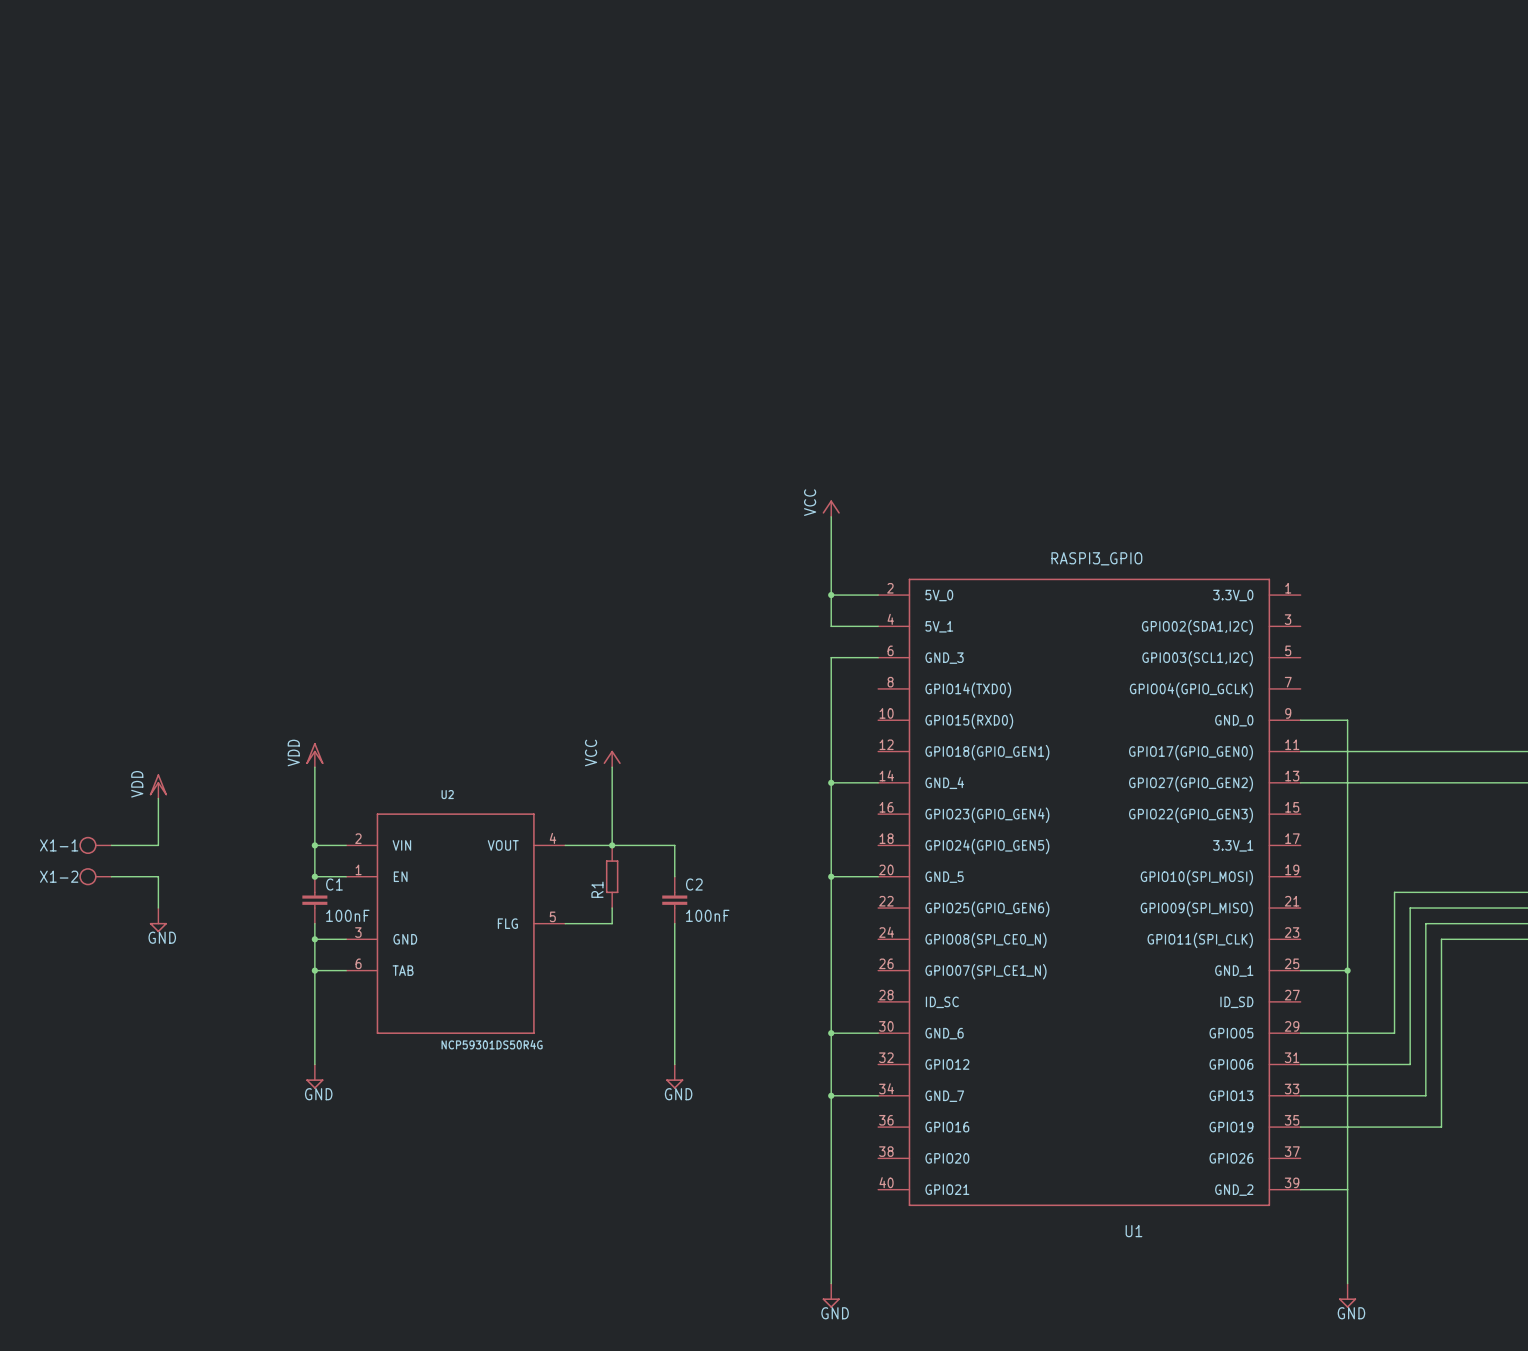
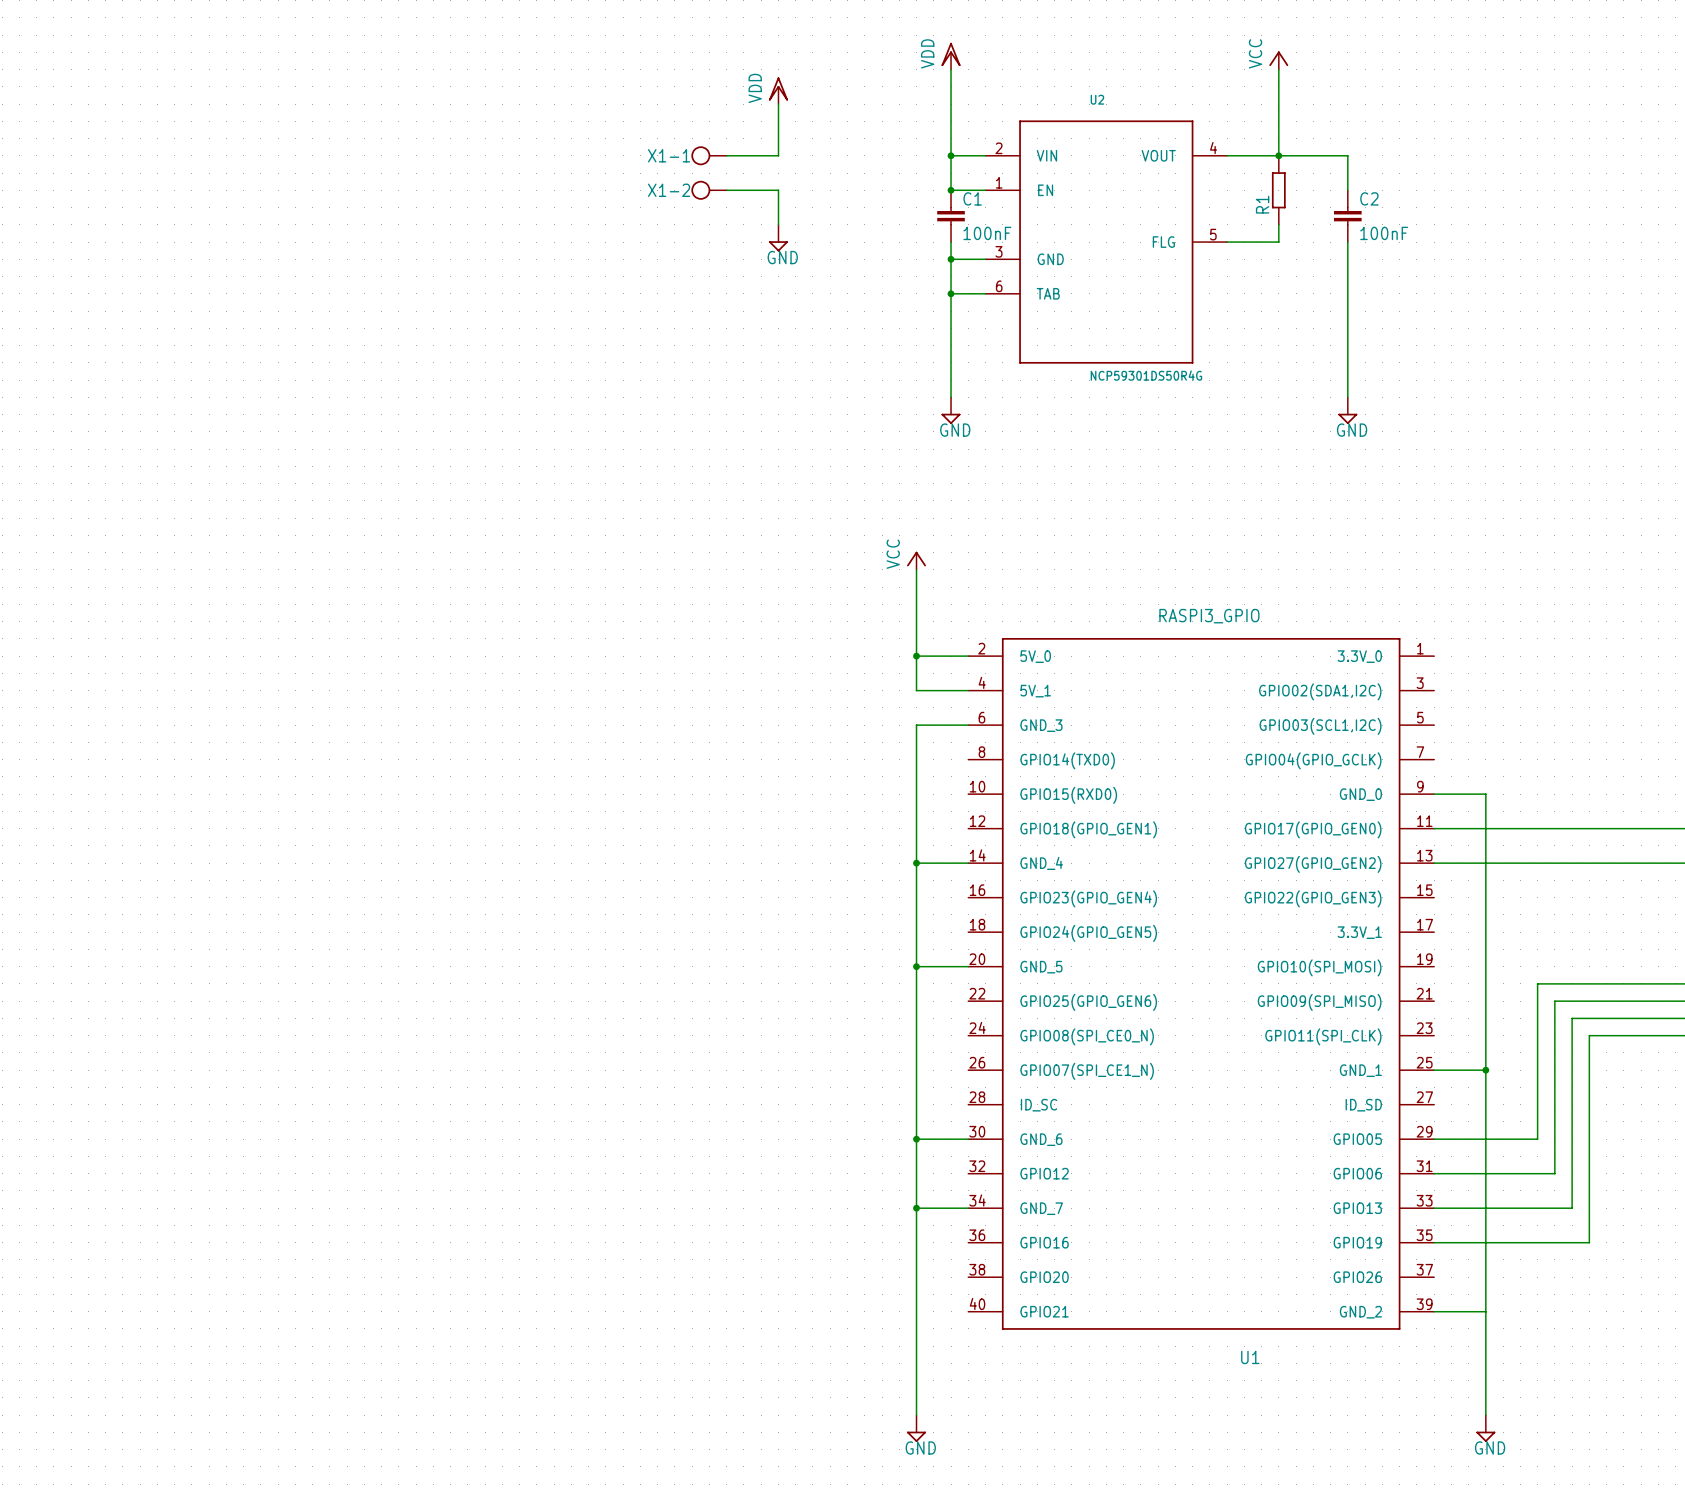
power symbol: none -> VDD (951, 56)
power symbol: none -> VCC (1278, 60)
wire: none -> (951, 69) (951, 190) (985, 190)
wire: none -> (1278, 69) (1278, 155)
power symbol: none -> VDD (778, 90)
wire: none -> (778, 104) (778, 155) (726, 155)
wire: none -> (951, 155) (985, 155)
junction: none -> (951, 155)
wire: none -> (1227, 155) (1347, 155) (1347, 190)
junction: none -> (1278, 155)
wire: none -> (726, 190) (778, 190) (778, 224)
junction: none -> (951, 190)
wire: none -> (1278, 224) (1278, 242) (1227, 242)
power symbol: none -> GND (778, 238)
wire: none -> (951, 242) (951, 397)
wire: none -> (1347, 242) (1347, 397)
wire: none -> (951, 259) (985, 259)
junction: none -> (951, 259)
wire: none -> (951, 293) (985, 293)
junction: none -> (951, 293)
power symbol: none -> GND (951, 410)
power symbol: none -> GND (1347, 410)
power symbol: VDD (314, 755) -> none
power symbol: VCC (612, 758) -> none
wire: (314, 767) (314, 876) (346, 876) -> none
wire: (612, 767) (612, 845) -> none
power symbol: VDD (158, 786) -> none
wire: (158, 798) (158, 845) (111, 845) -> none
X1-1 position: (95, 845) -> (709, 155)
wire: (314, 845) (346, 845) -> none
junction: (314, 845) -> none
wire: (565, 845) (674, 845) (674, 876) -> none
junction: (612, 845) -> none
X1-2 position: (95, 876) -> (709, 190)
wire: (111, 876) (158, 876) (158, 908) -> none
junction: (314, 876) -> none
R1 position: (612, 876) -> (1278, 190)
C1 position: (314, 900) -> (951, 216)
C2 position: (674, 900) -> (1347, 216)
wire: (612, 908) (612, 923) (565, 923) -> none
power symbol: GND (158, 920) -> none
wire: (314, 923) (314, 1064) -> none
U2 position: (455, 923) -> (1106, 242)
wire: (674, 923) (674, 1064) -> none
wire: (314, 939) (346, 939) -> none
junction: (314, 939) -> none
wire: (314, 970) (346, 970) -> none
junction: (314, 970) -> none
power symbol: GND (314, 1076) -> none
power symbol: GND (674, 1076) -> none

